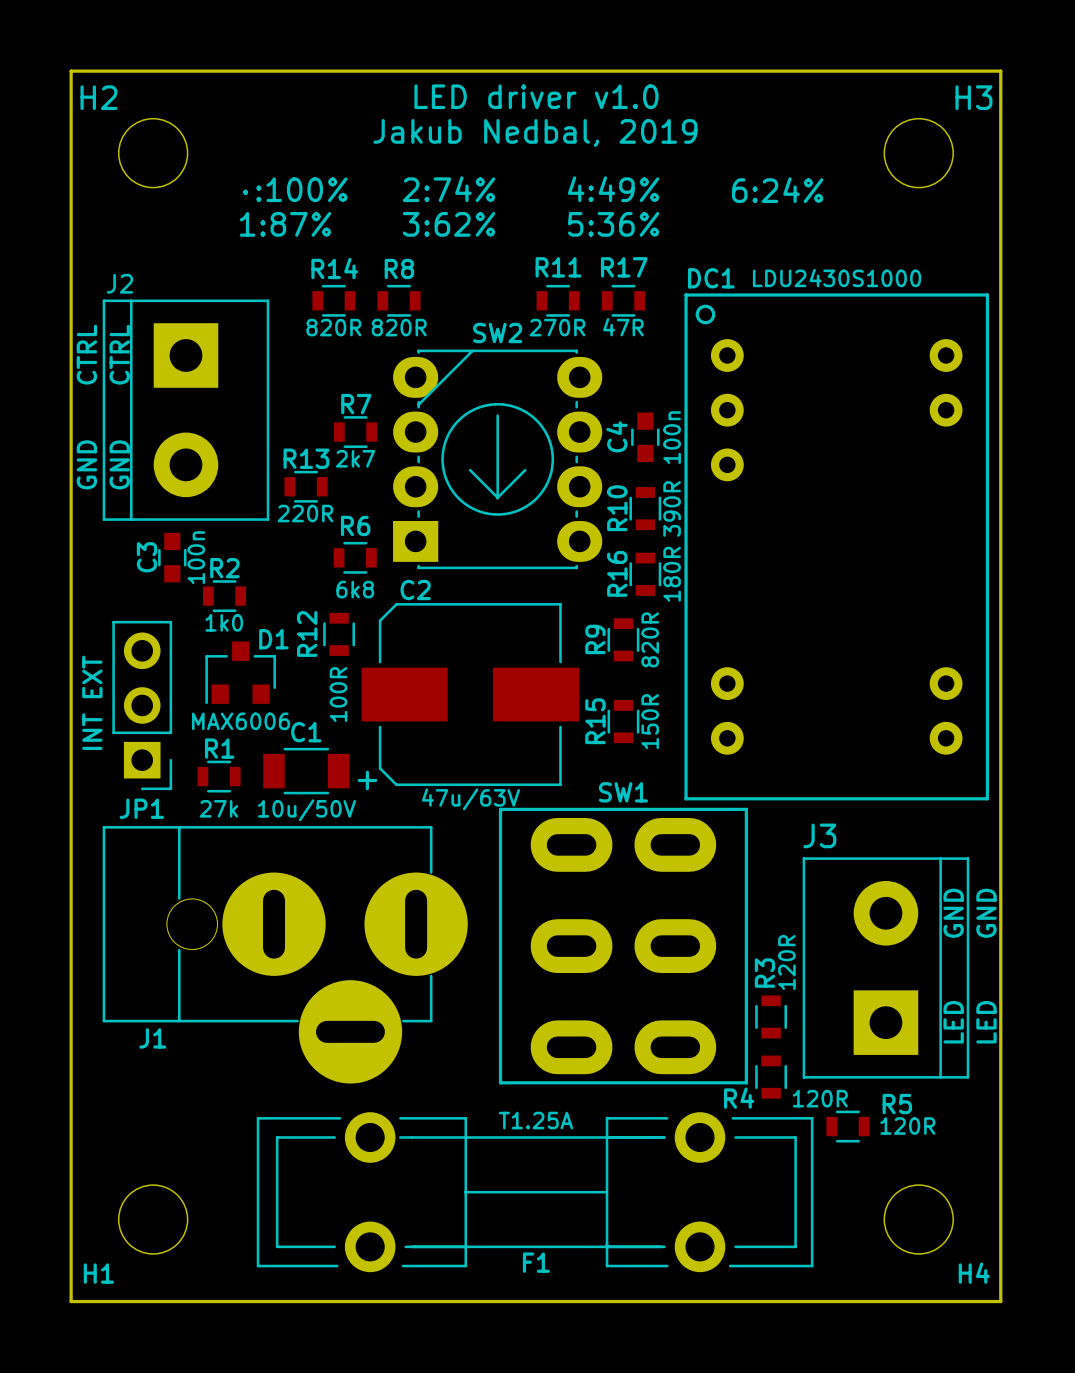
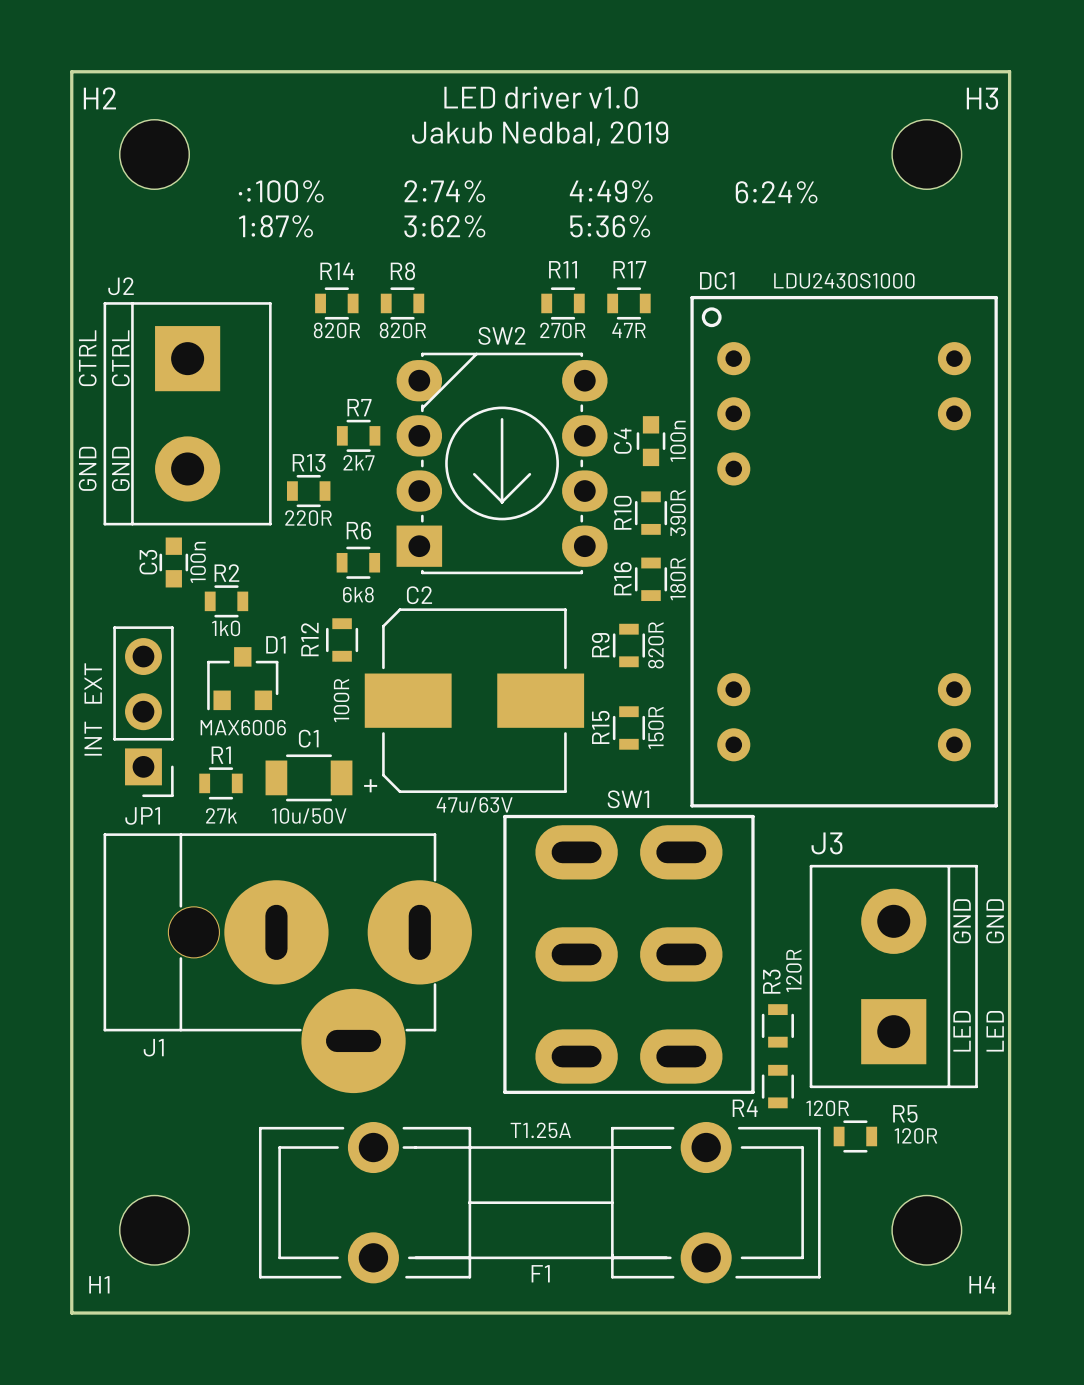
J1 footprint: [102, 826, 468, 1084] -> [103, 833, 472, 1094]

